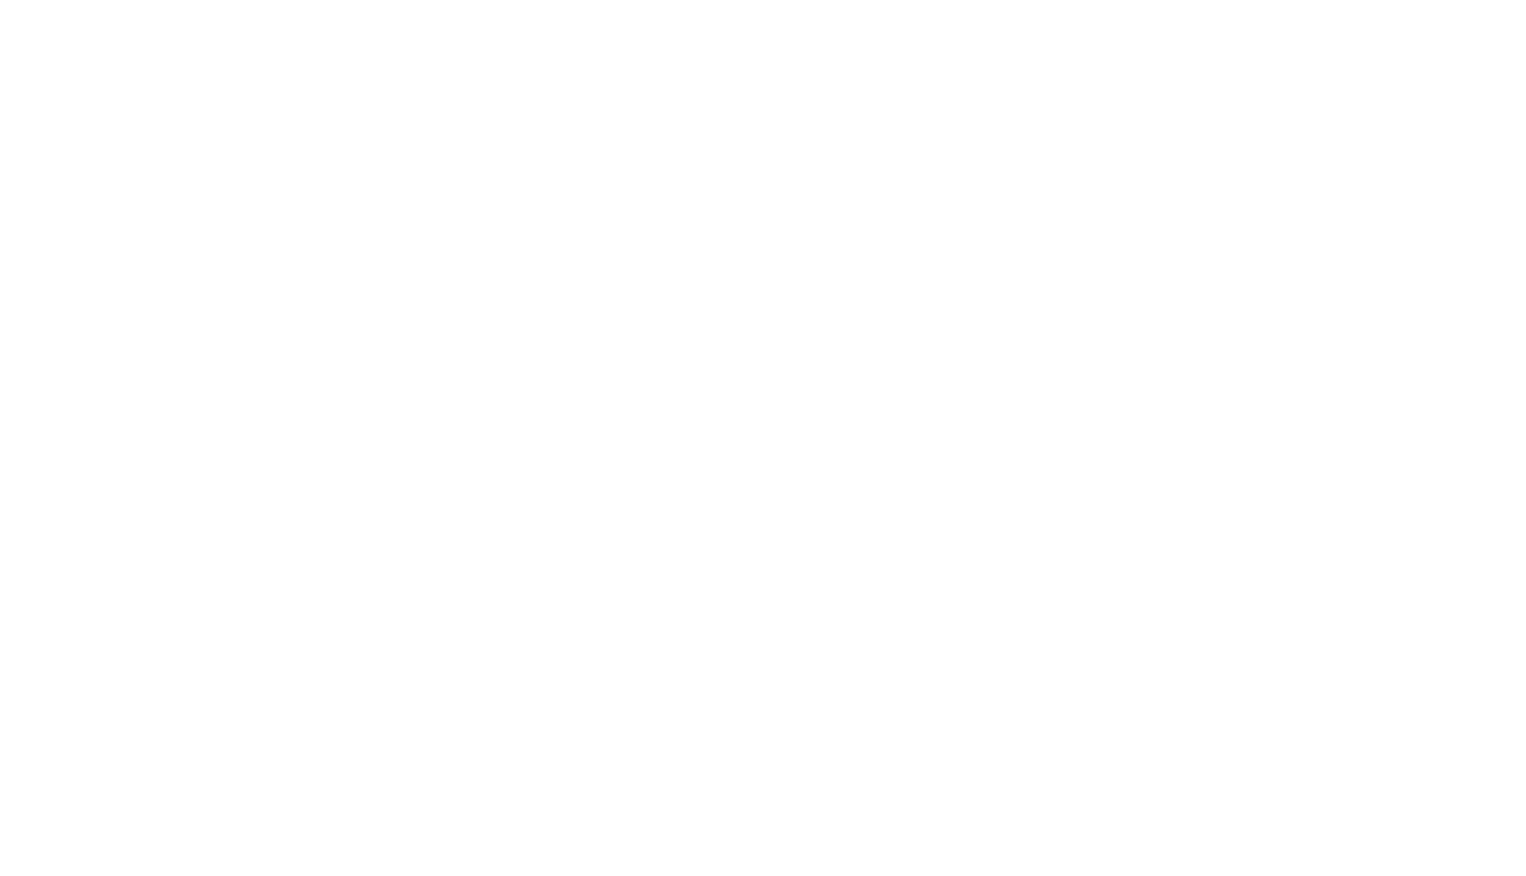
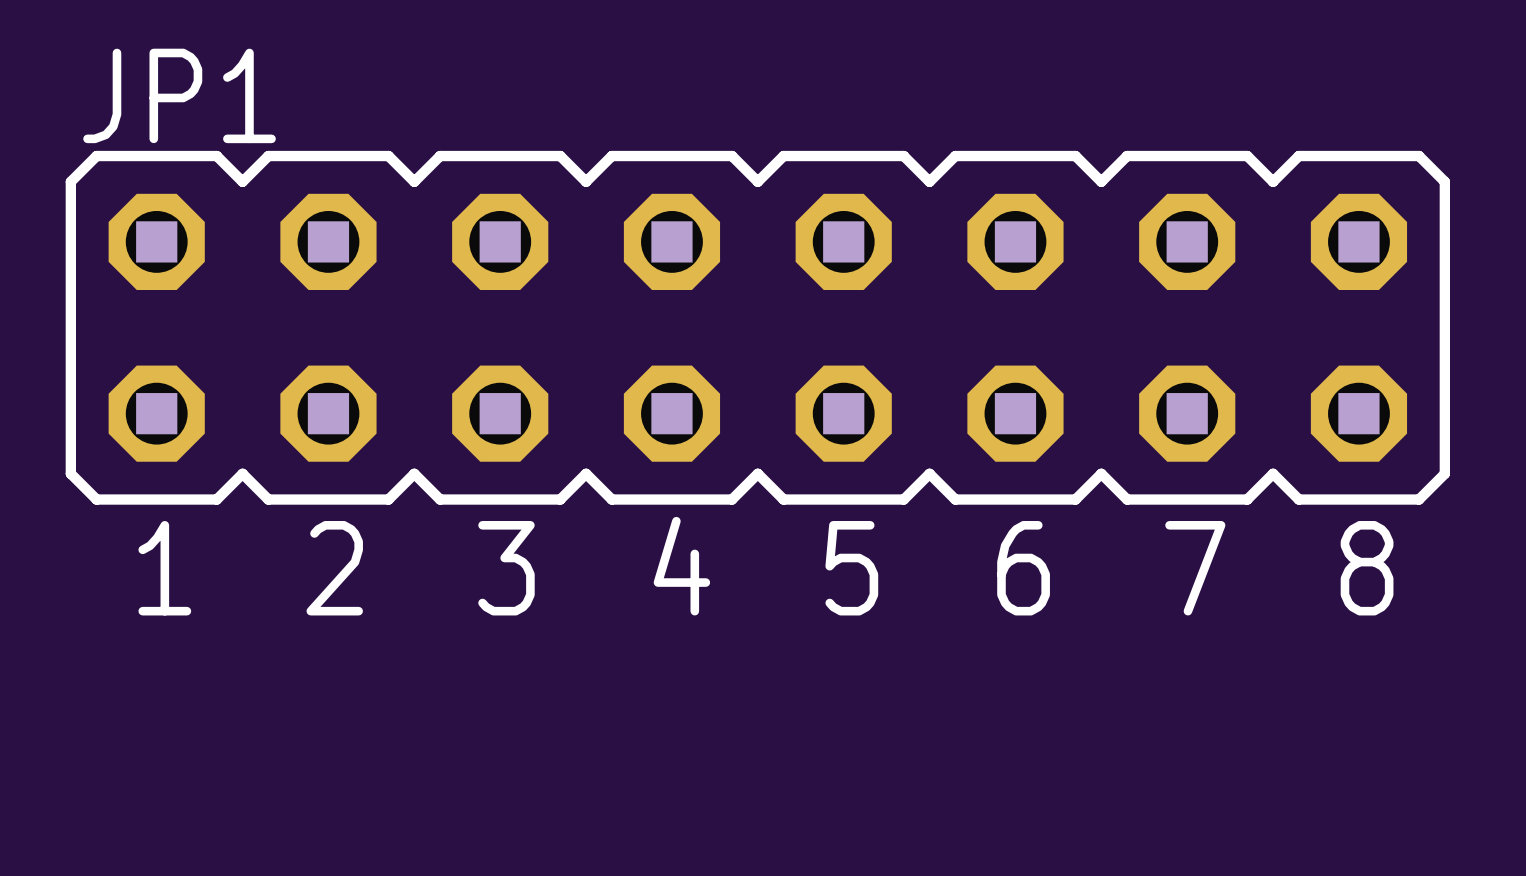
JP1: none -> (757, 327)

